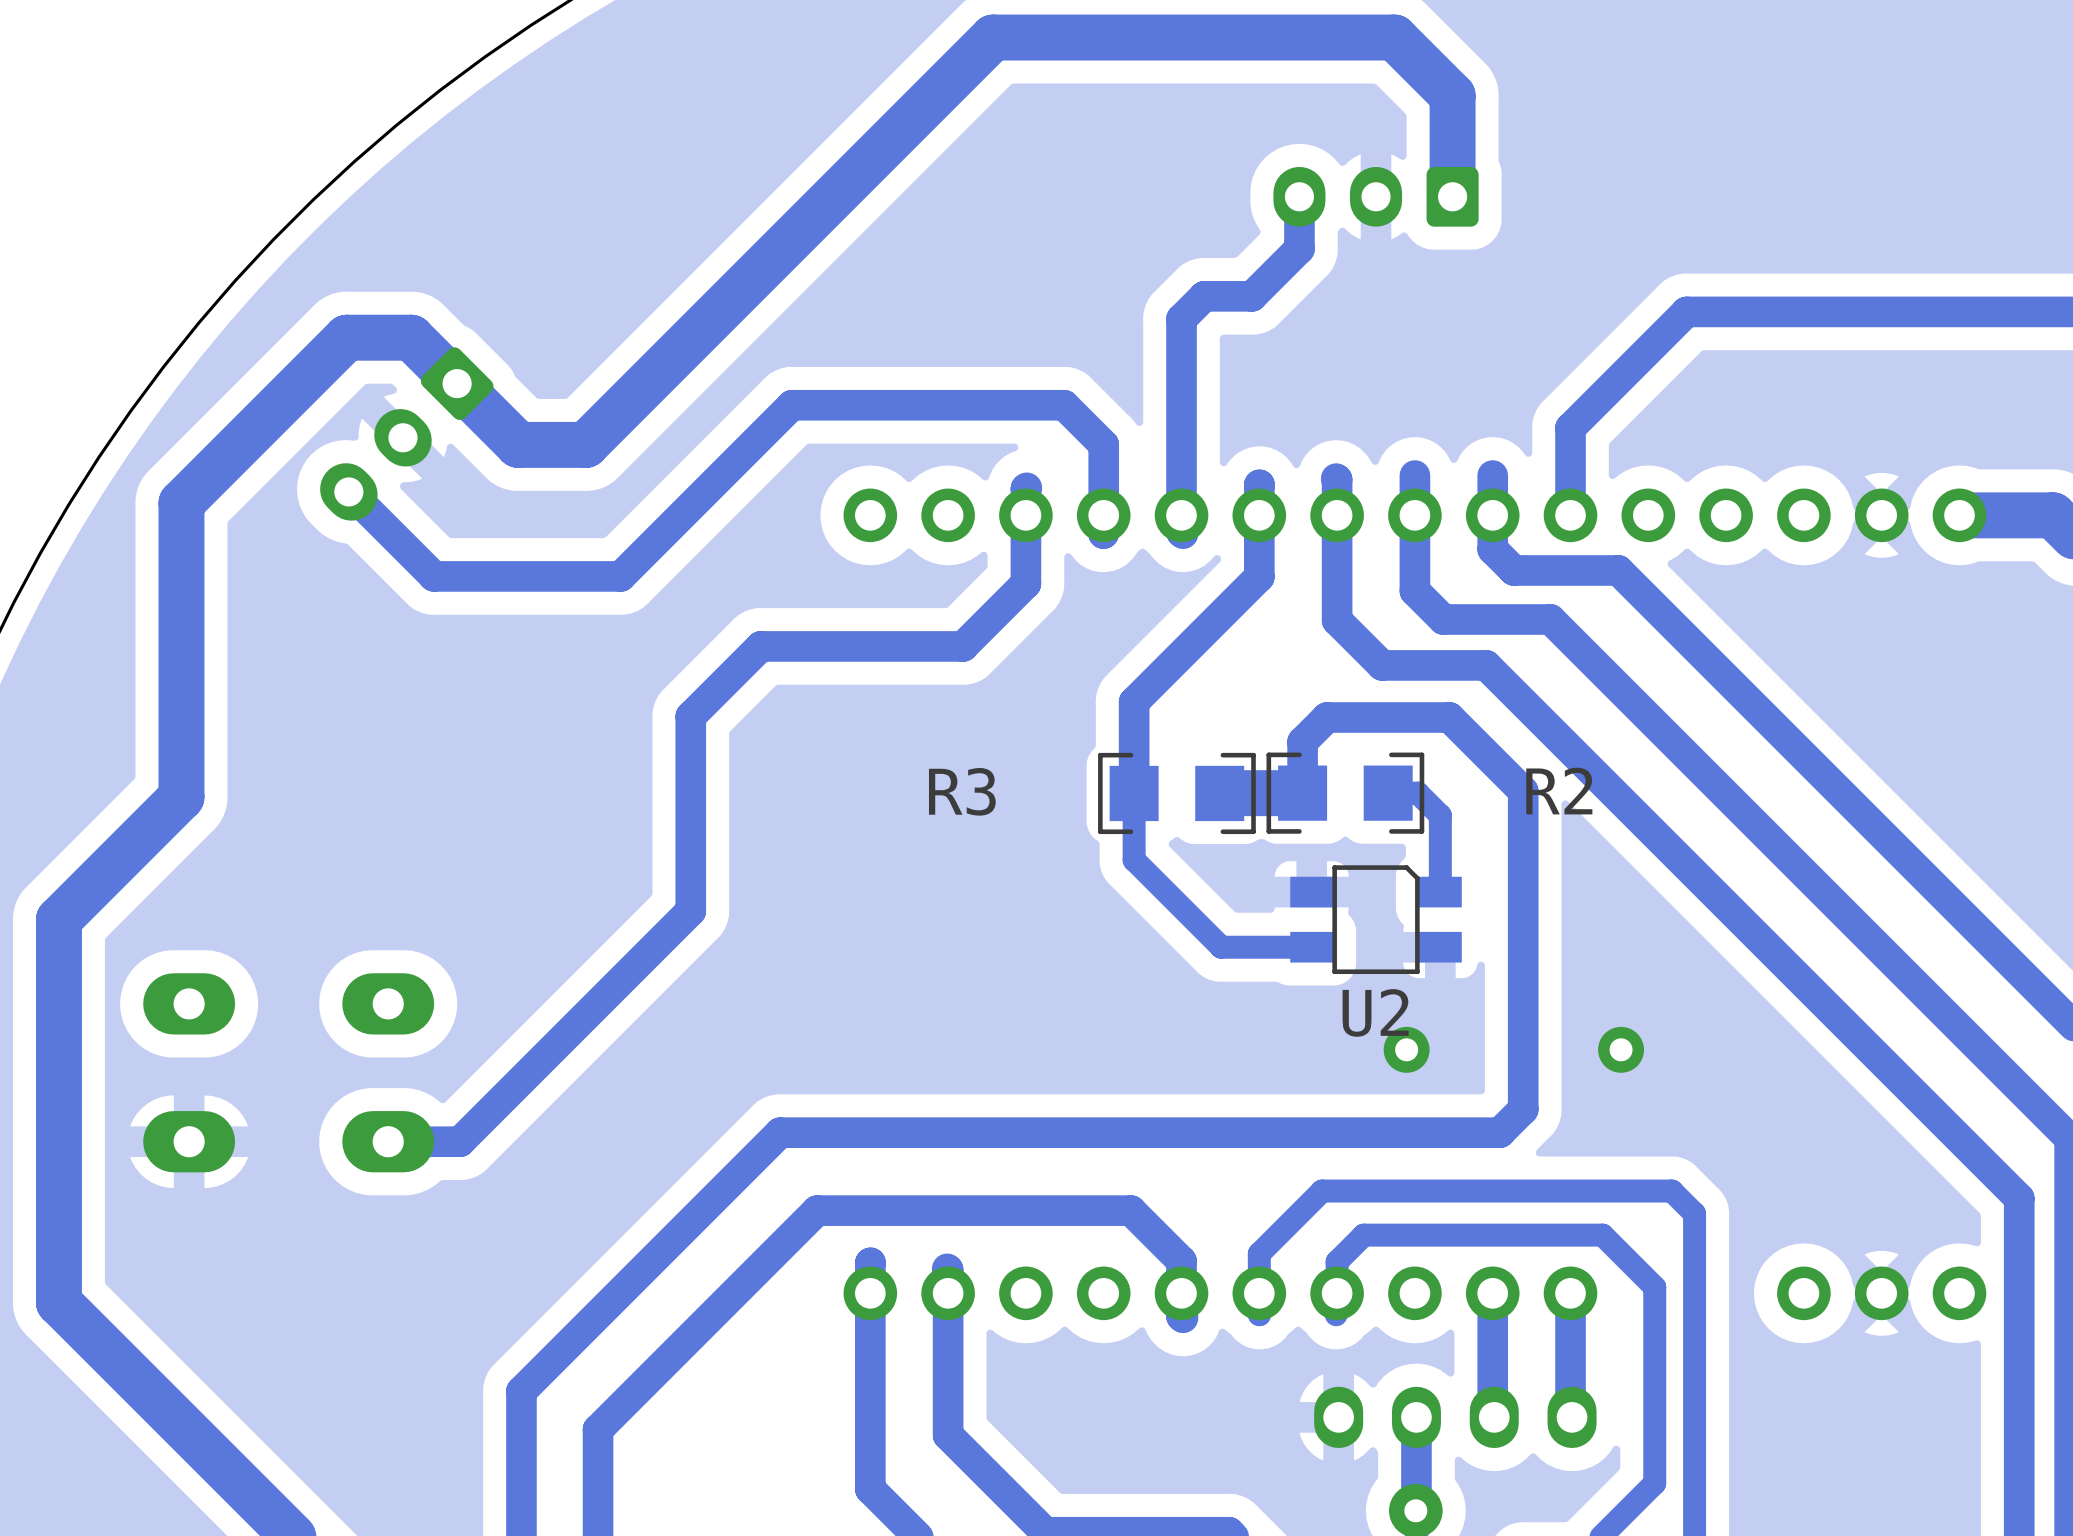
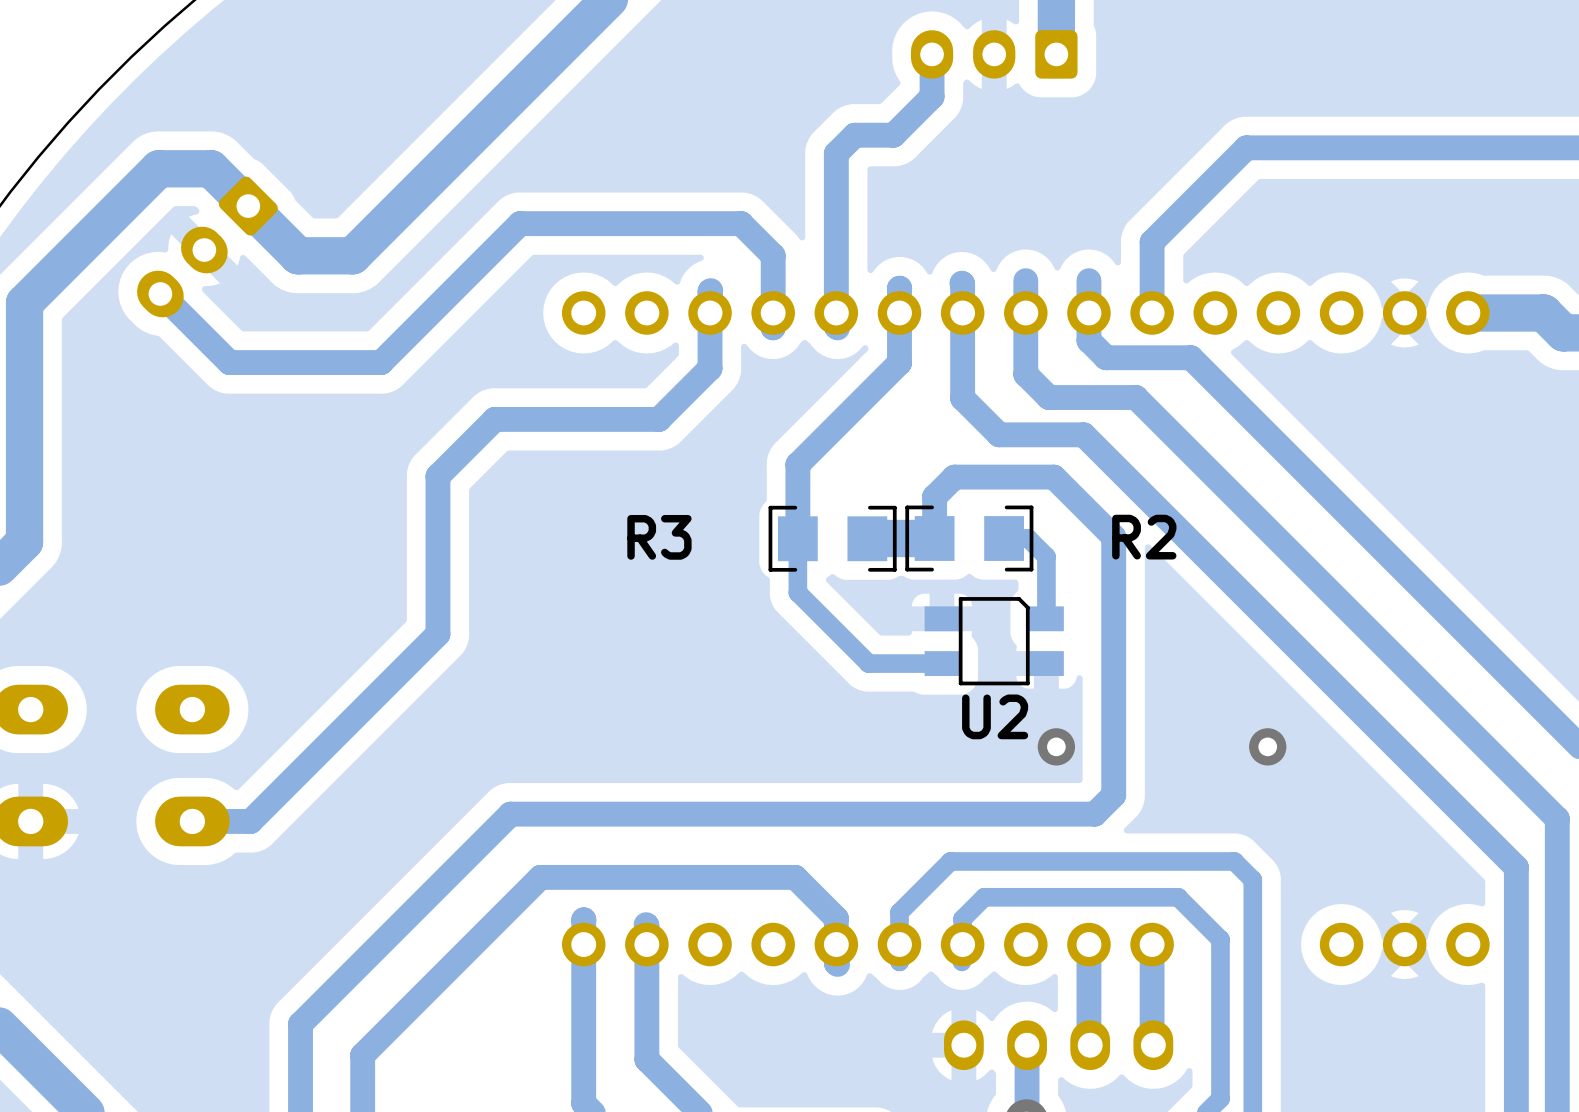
via position: (1406, 1049) -> (1056, 746)
via: (1621, 1049) -> none
via: none -> (1267, 746)

